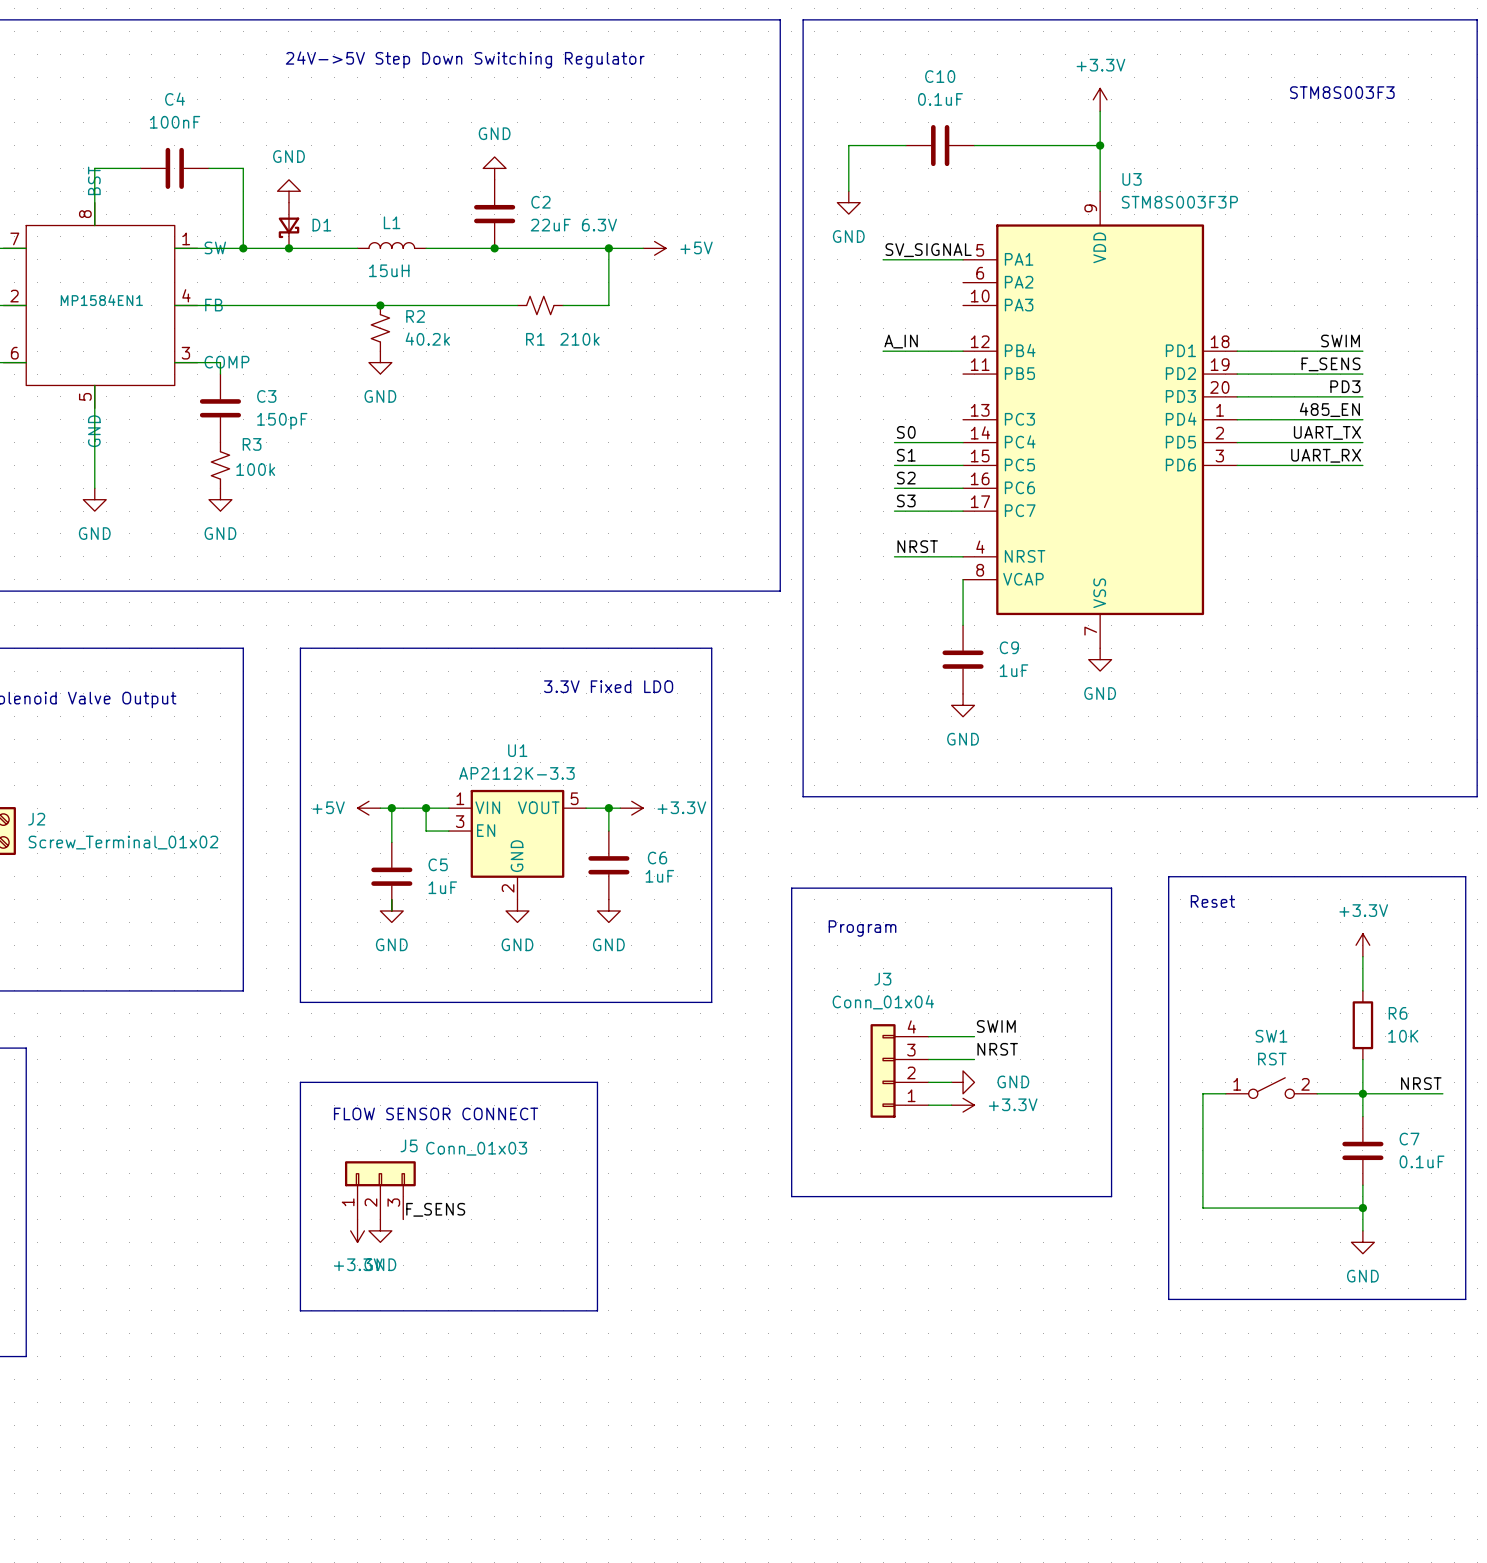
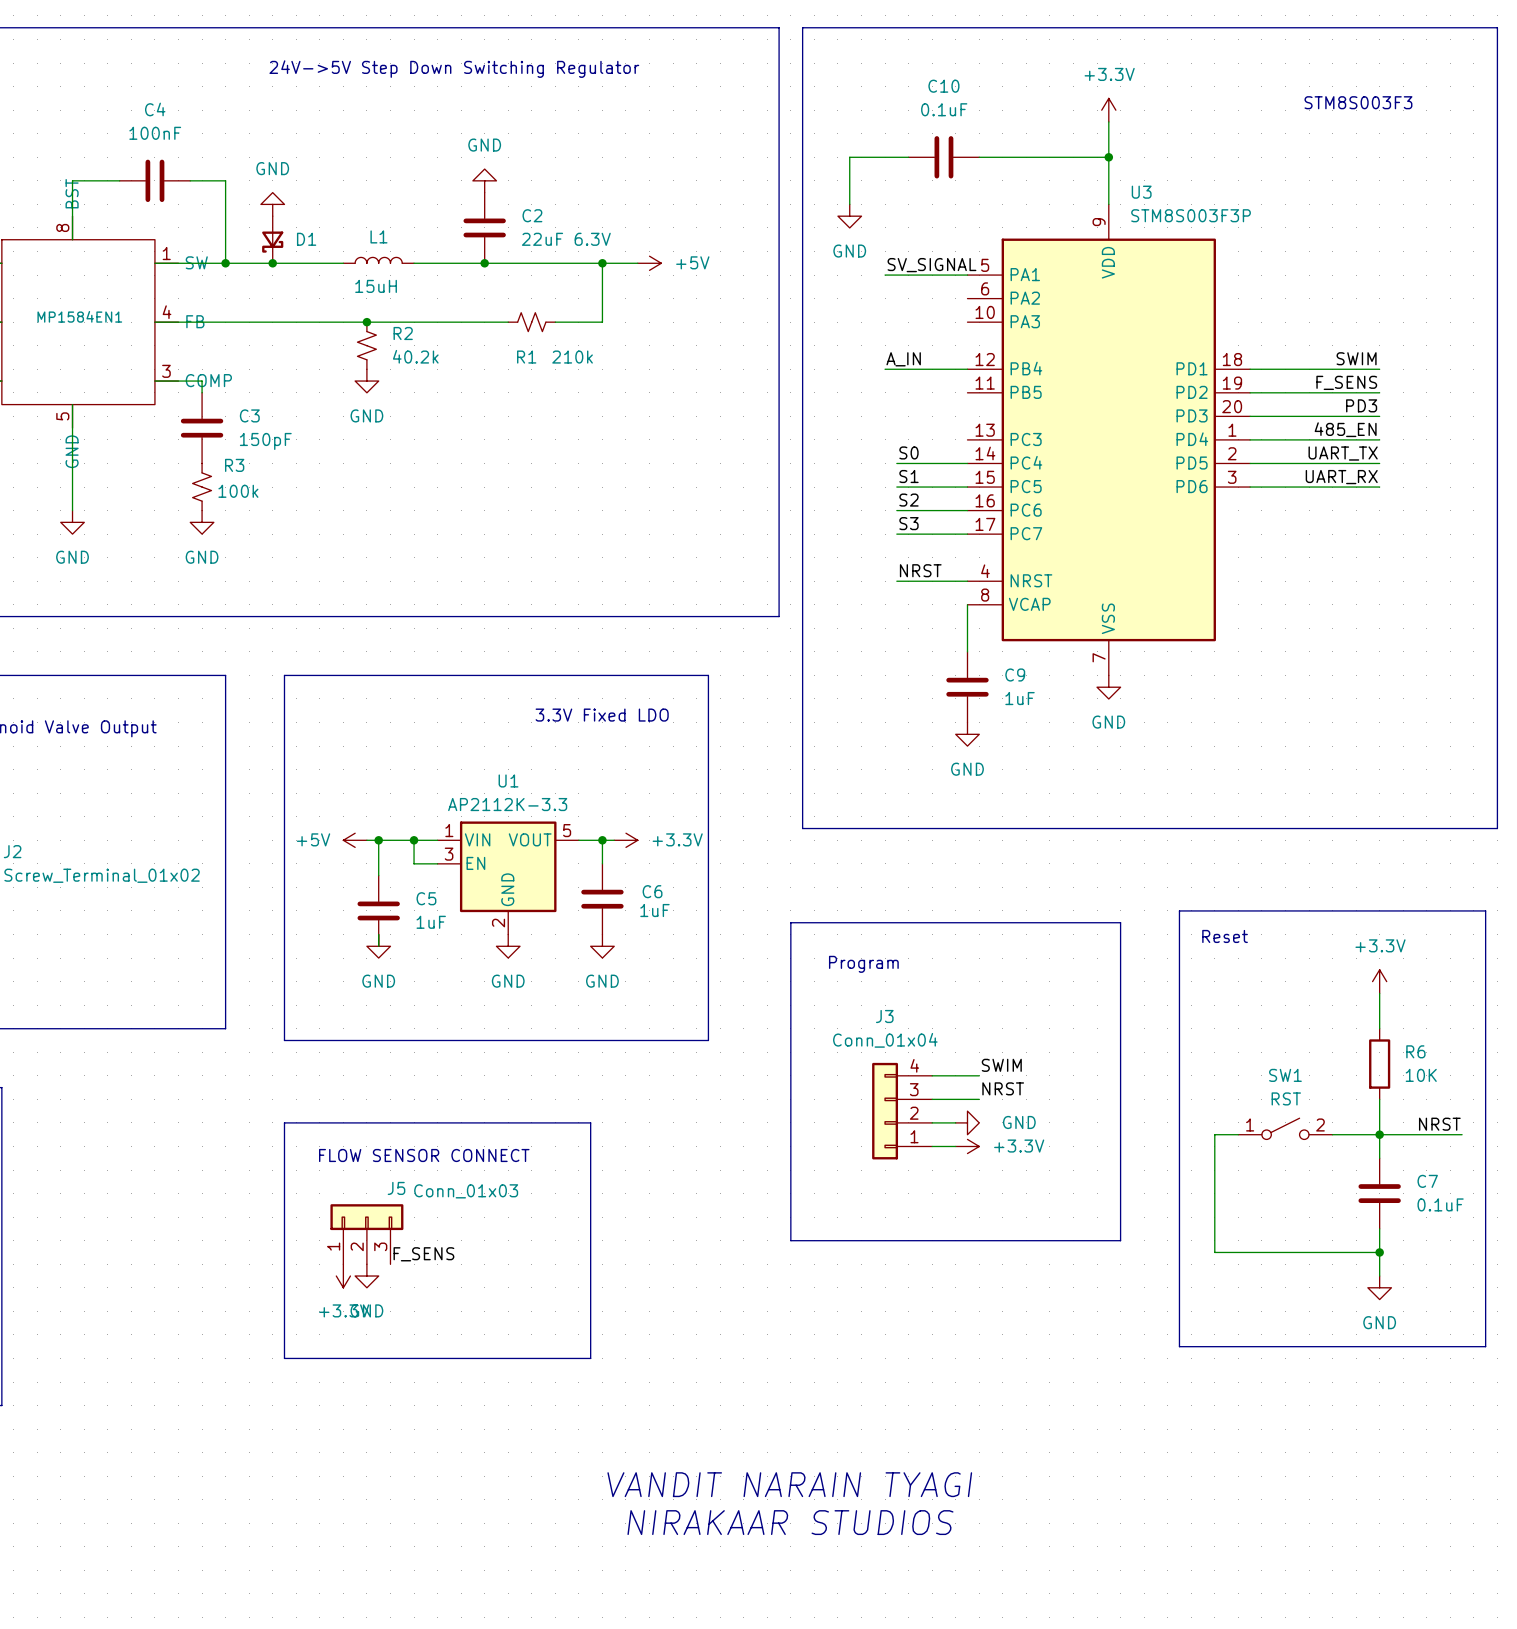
text: none -> VANDIT NARAIN TYAGI (789, 1484)
text: none -> NIRAKAAR STUDIOS (790, 1522)

